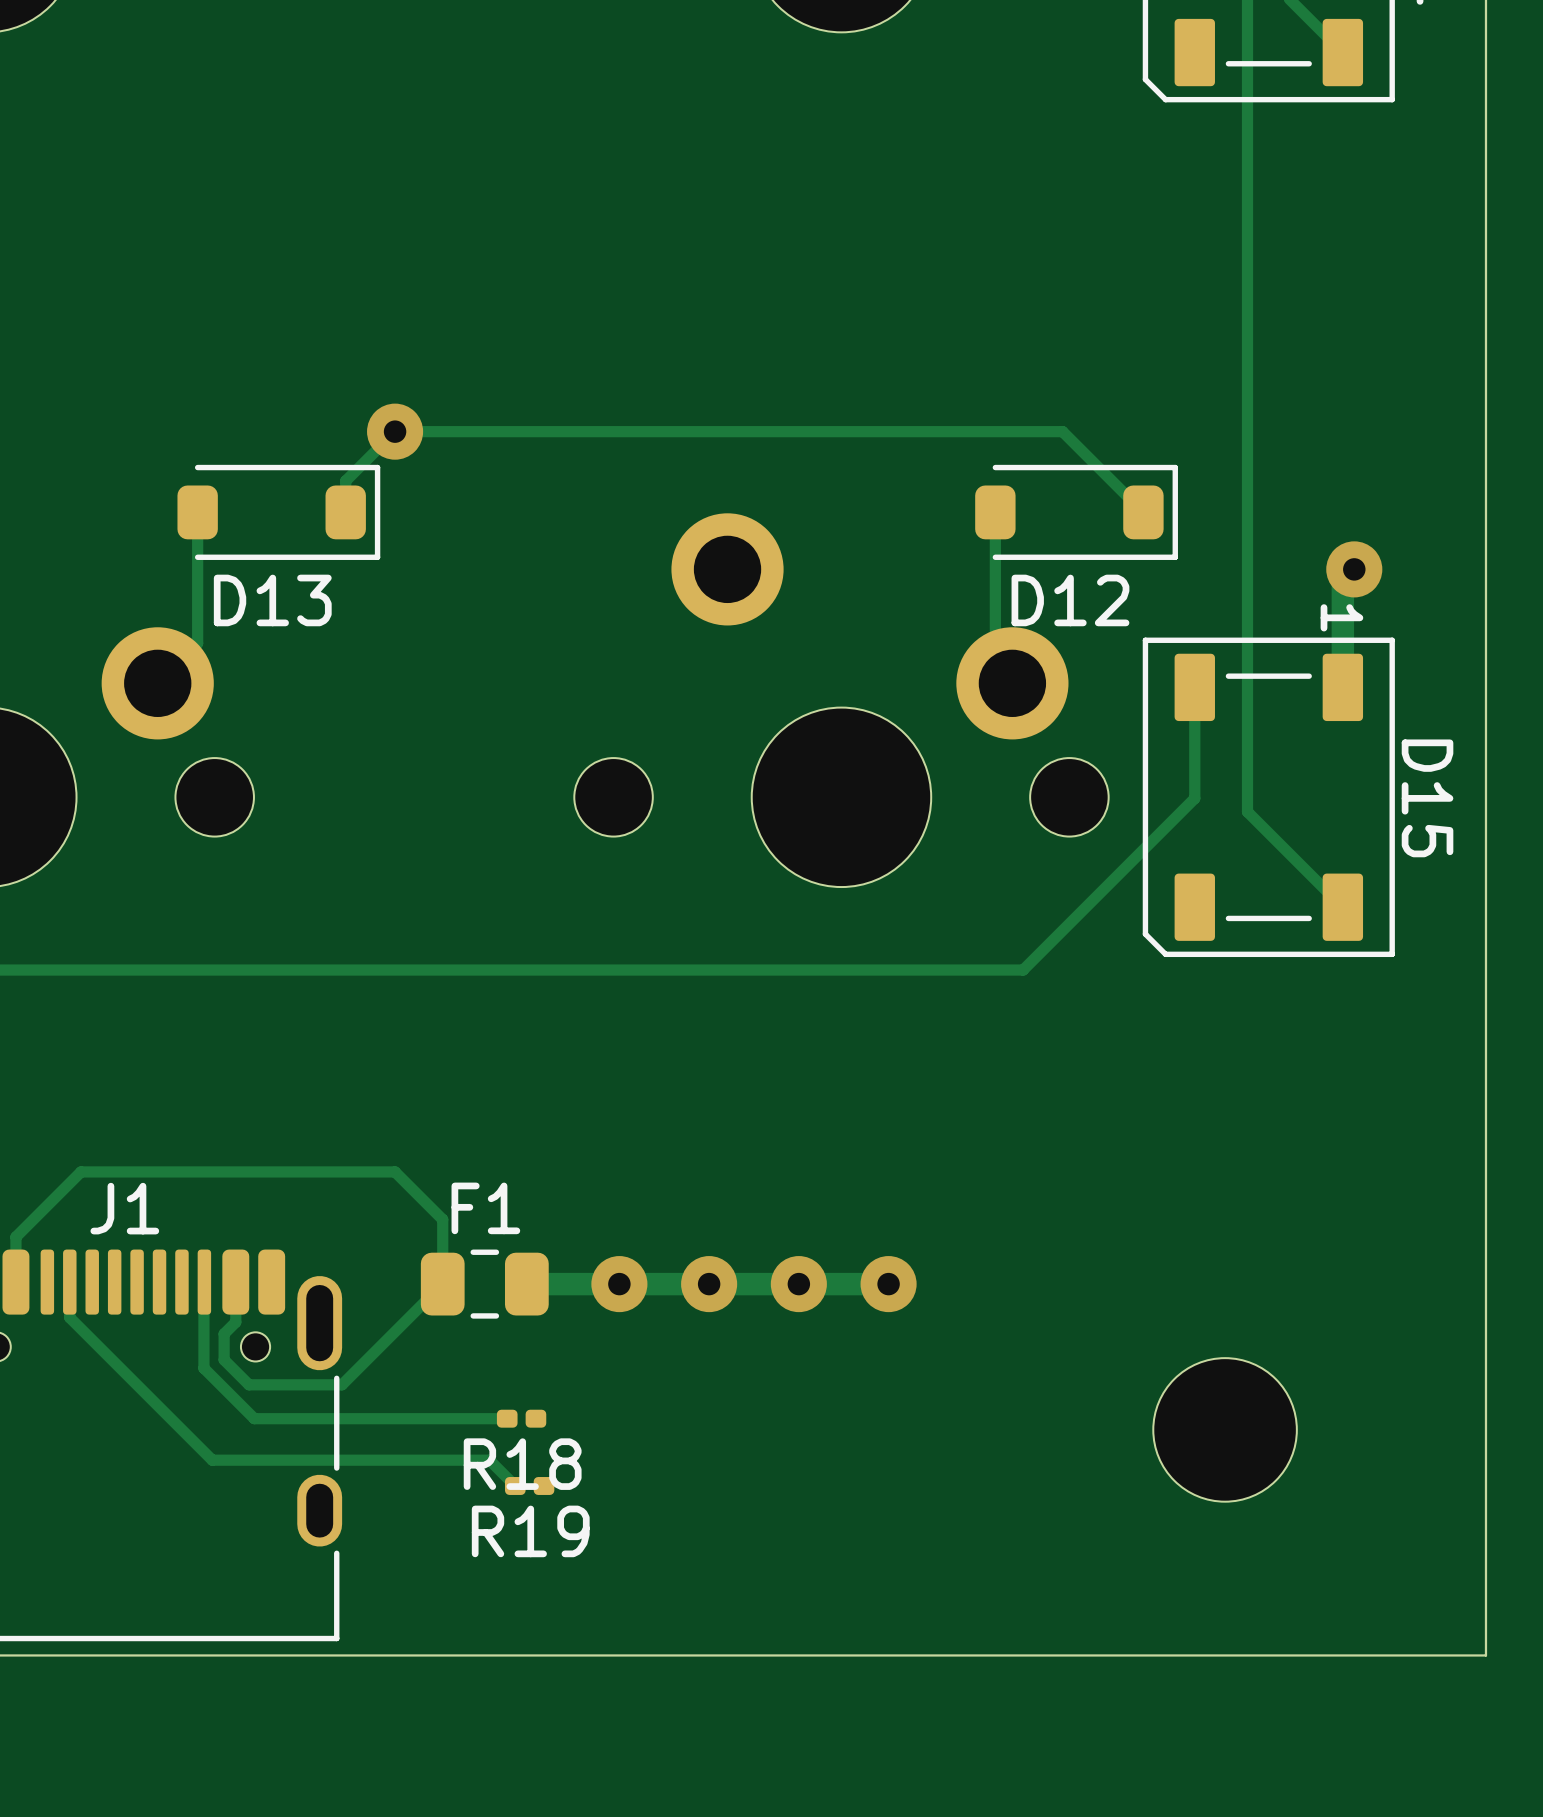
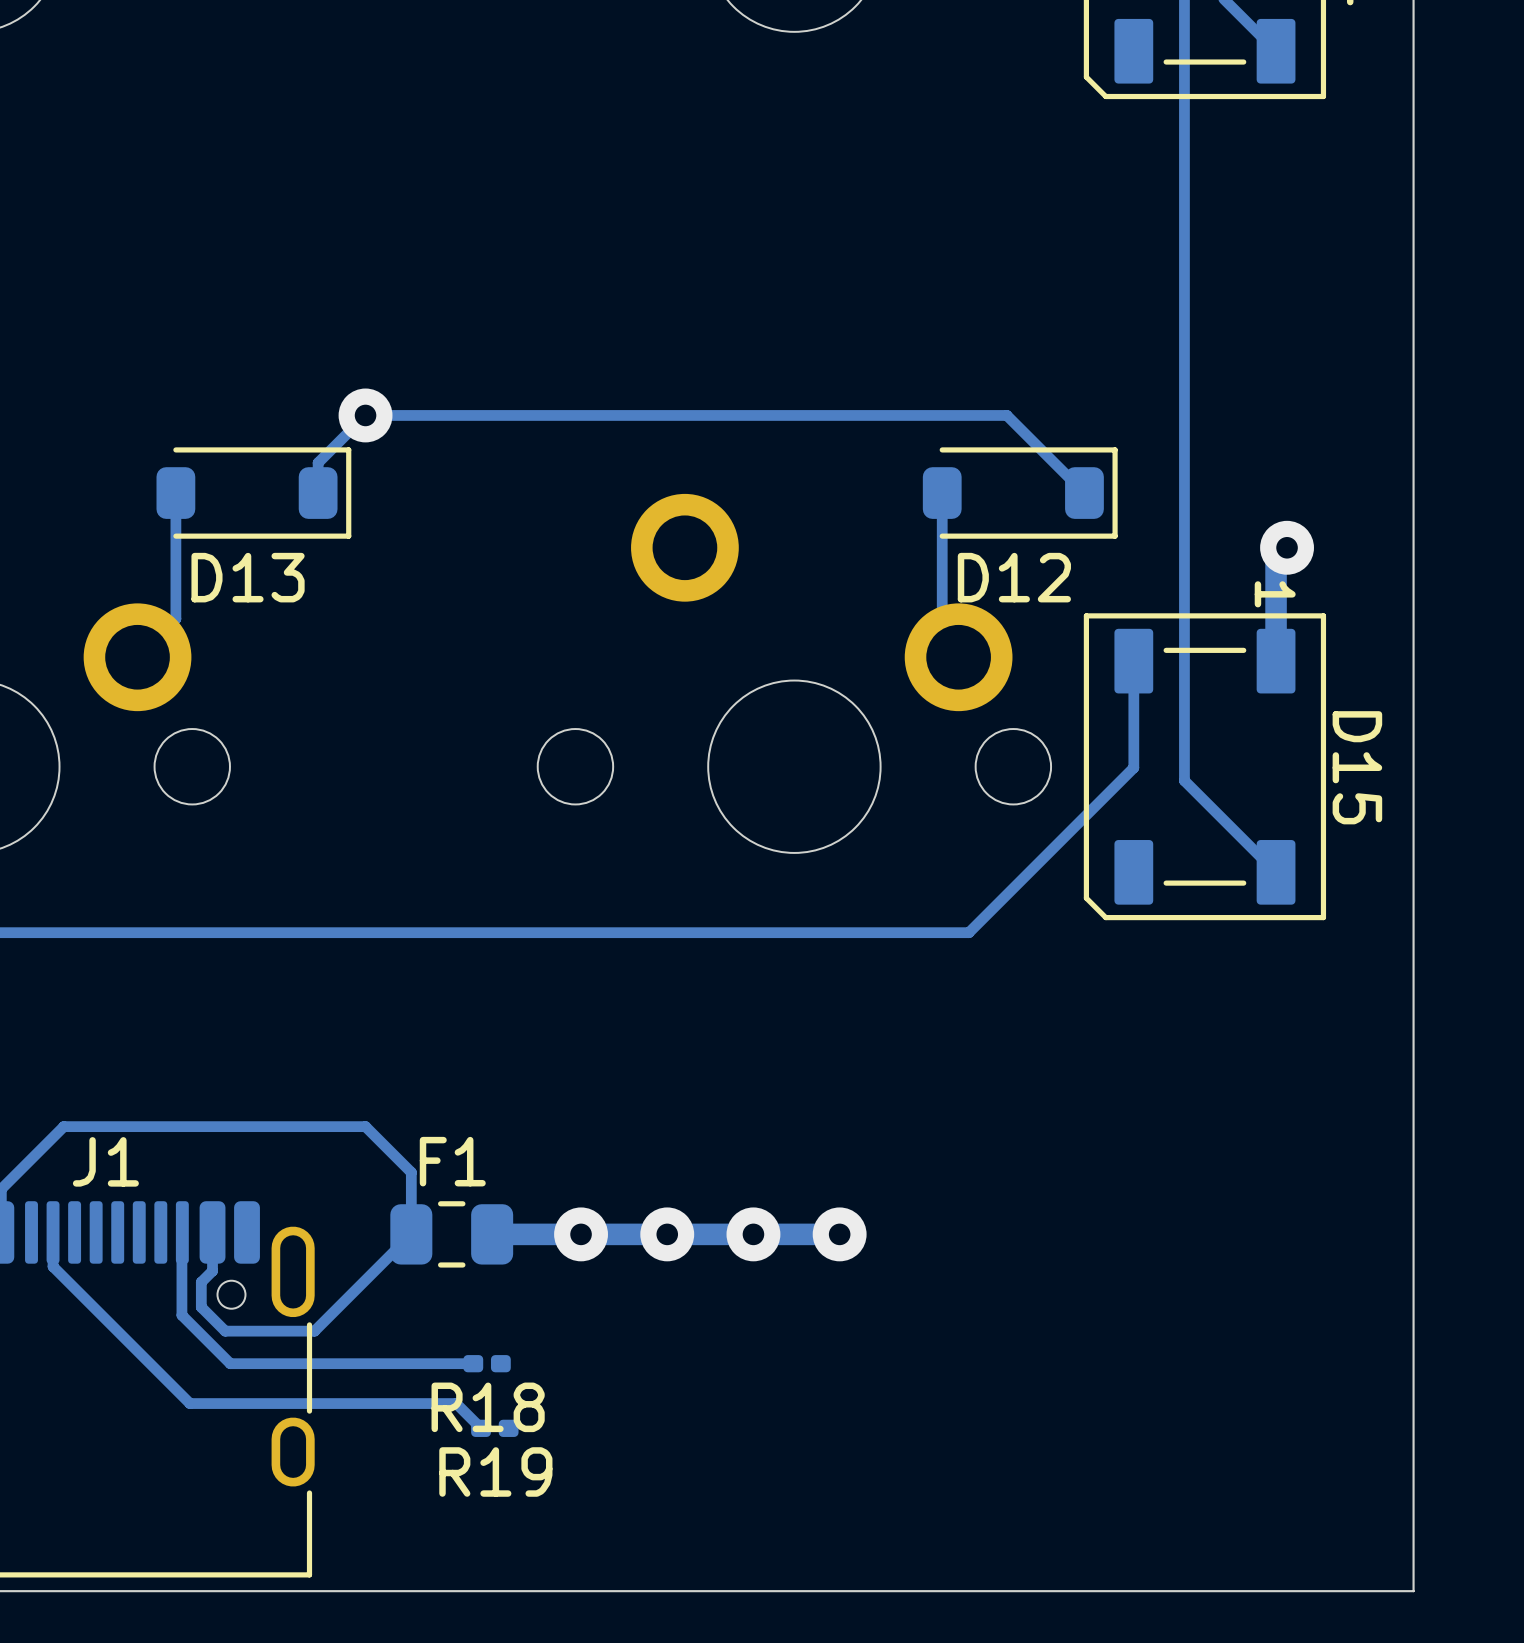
part: (1225, 1429) -> none

